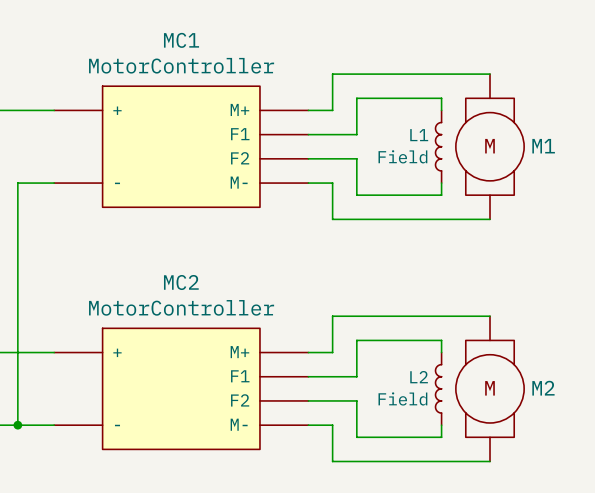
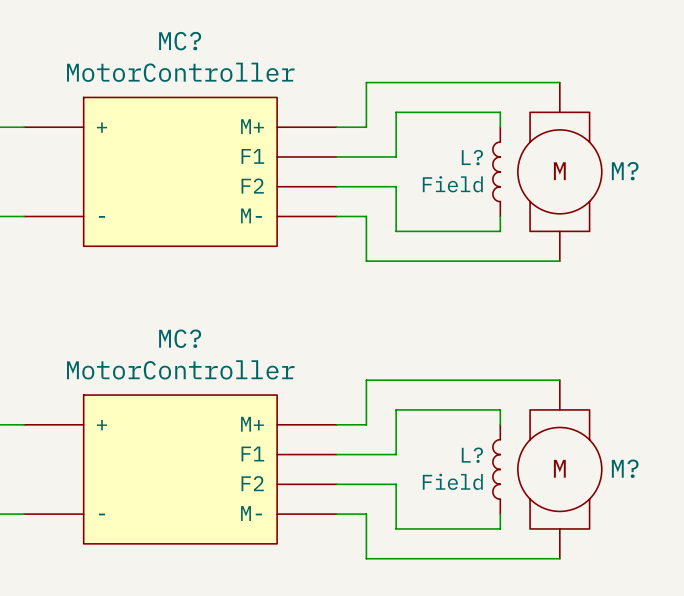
MC1 name: MC1 (181, 40) -> MC? (180, 41)
L1 name: L1 (419, 135) -> L? (472, 157)
M1 name: M1 (543, 146) -> M? (625, 171)
MC2 name: MC2 (181, 282) -> MC? (180, 338)
L2 name: L2 (419, 377) -> L? (472, 455)
M2 name: M2 (543, 388) -> M? (625, 468)

